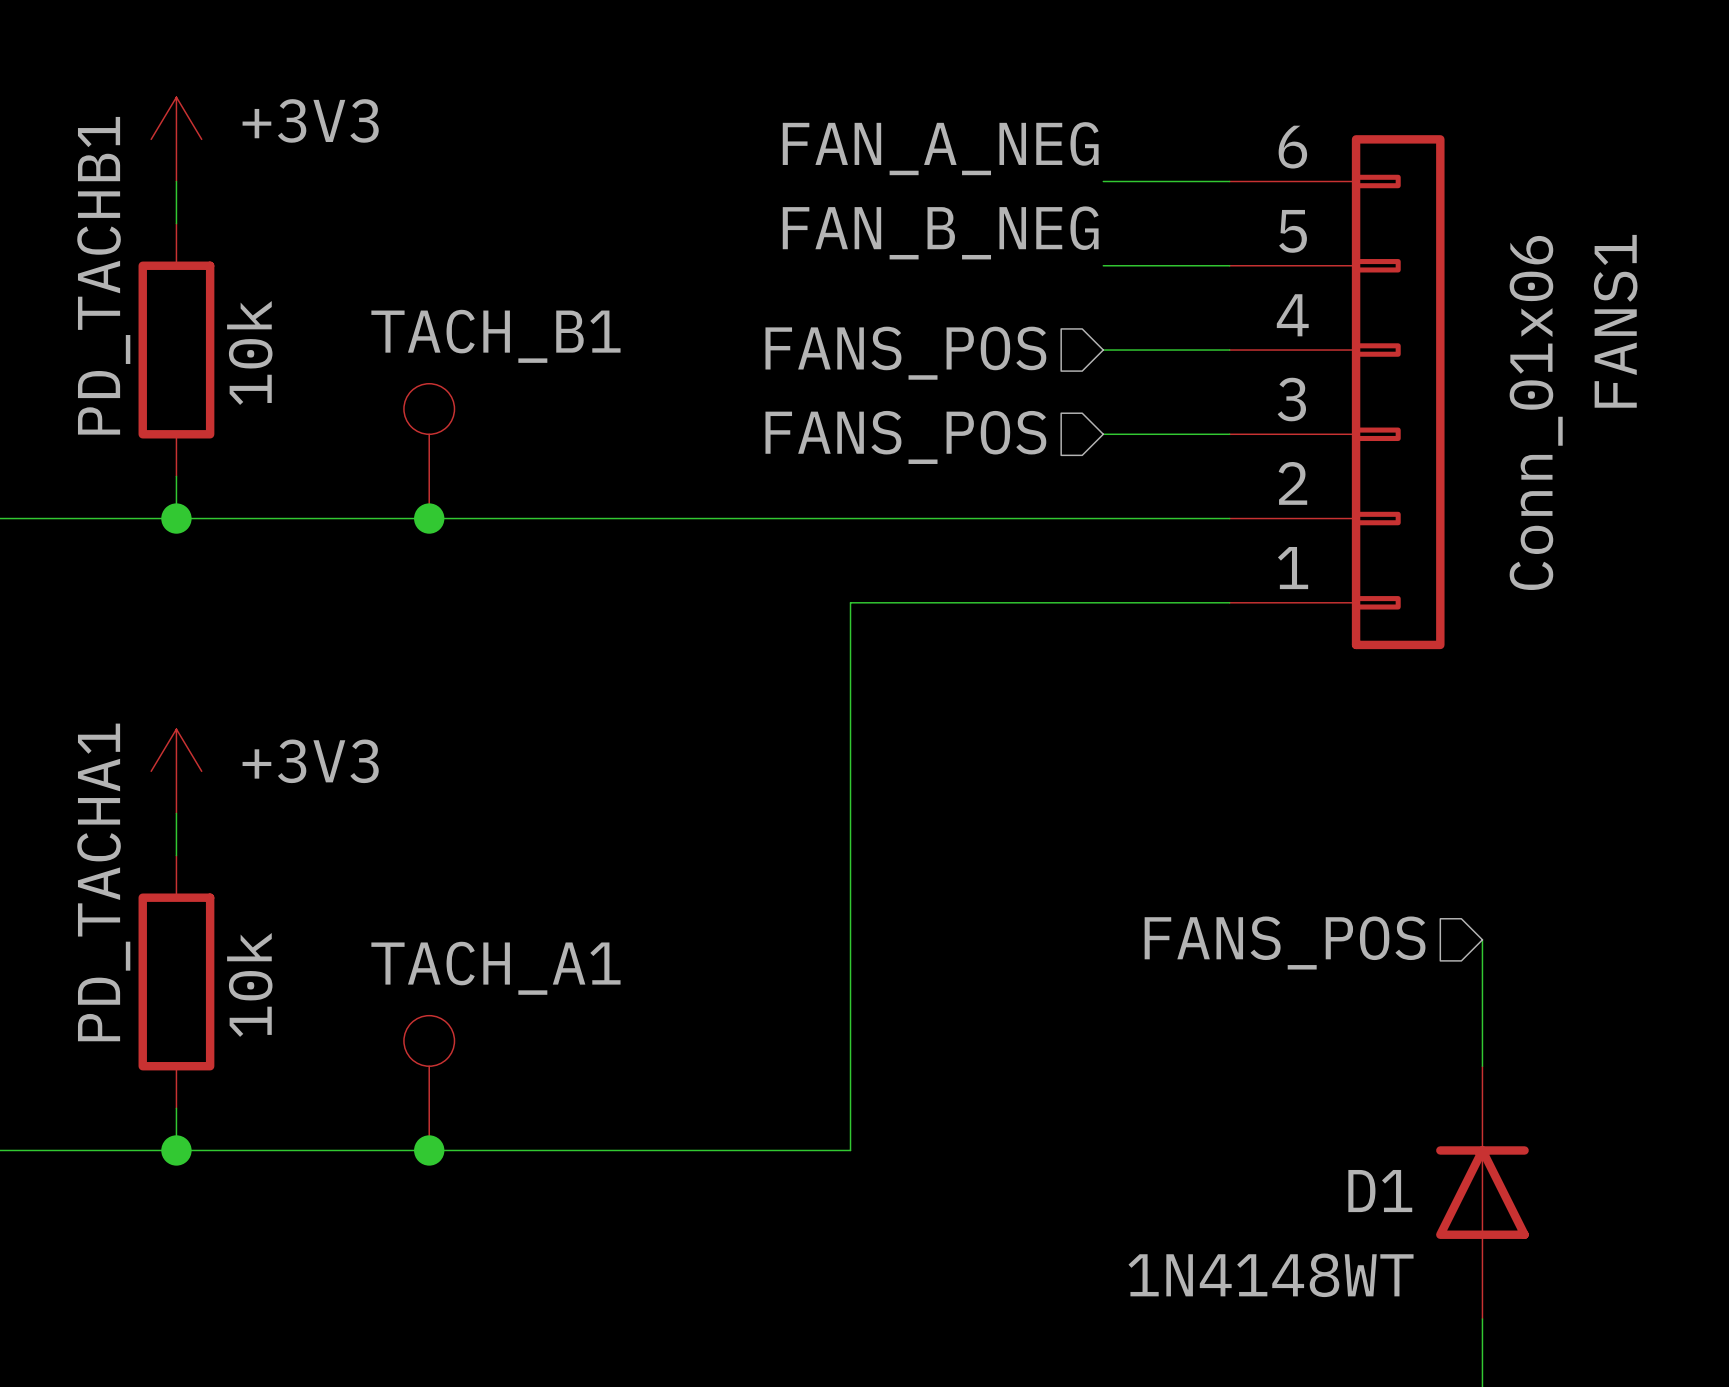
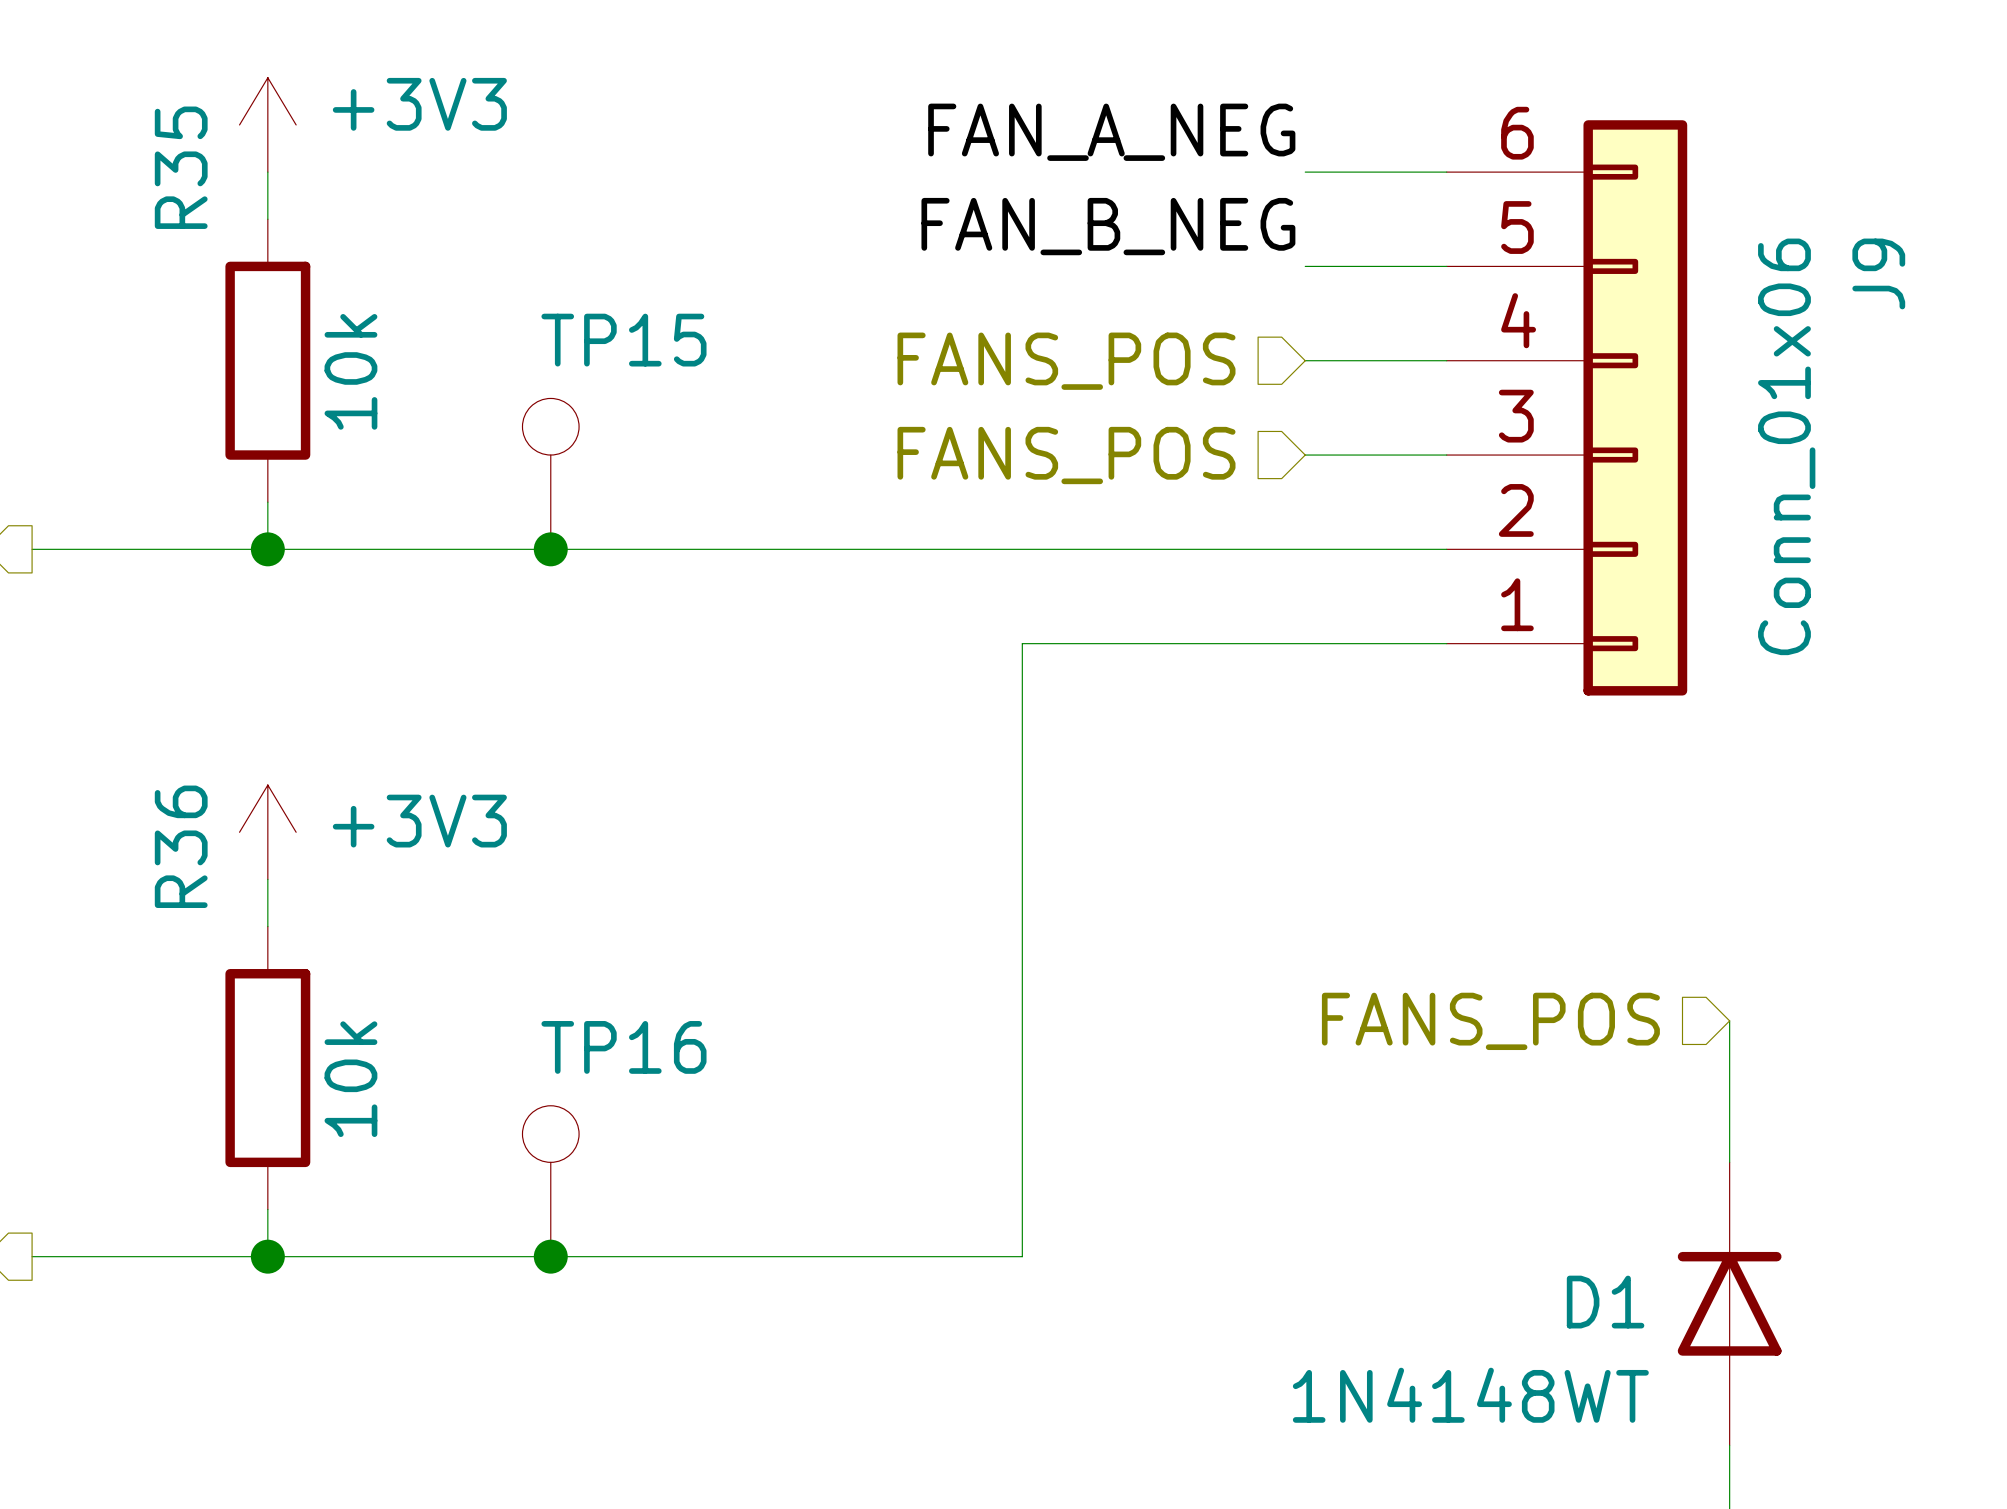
PD_TACHB1 name: PD_TACHB1 (103, 275) -> R35 (181, 167)
FANS1 name: FANS1 (1615, 321) -> J9 (1878, 273)
TACH_B1 name: TACH_B1 (495, 336) -> TP15 (623, 340)
PD_TACHA1 name: PD_TACHA1 (103, 882) -> R36 (181, 846)
TACH_A1 name: TACH_A1 (495, 968) -> TP16 (623, 1047)

